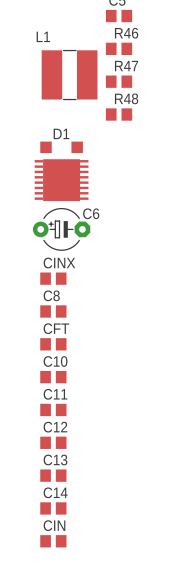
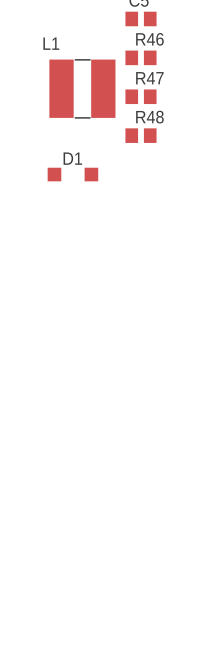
part: (61, 180) -> none
C6: (61, 229) -> none
CINX: (53, 278) -> none
C8: (53, 311) -> none
CFT: (53, 344) -> none
C10: (53, 377) -> none
C11: (53, 409) -> none
C12: (53, 442) -> none
C13: (53, 475) -> none
C14: (53, 508) -> none
CIN: (53, 541) -> none

